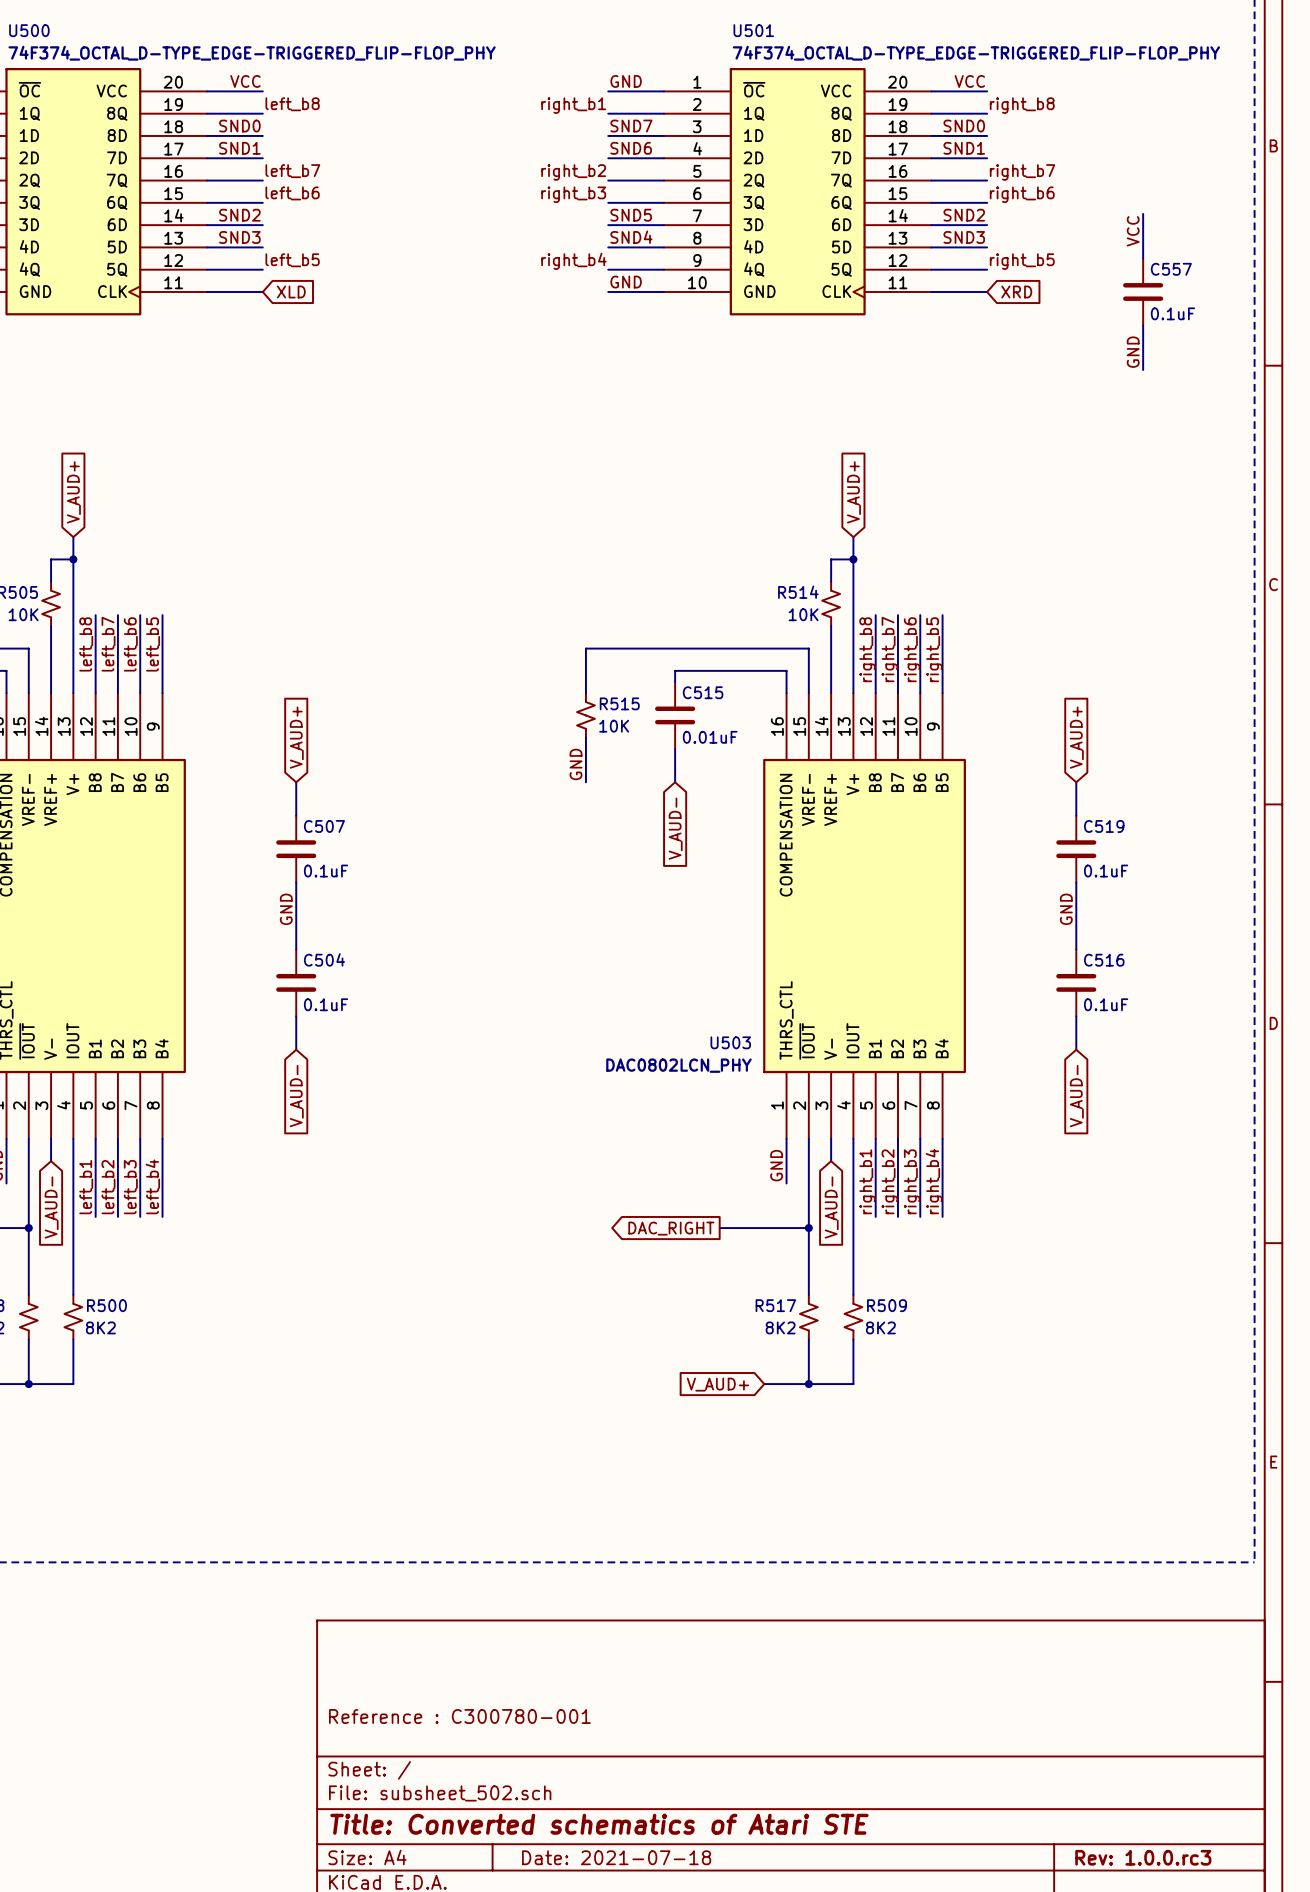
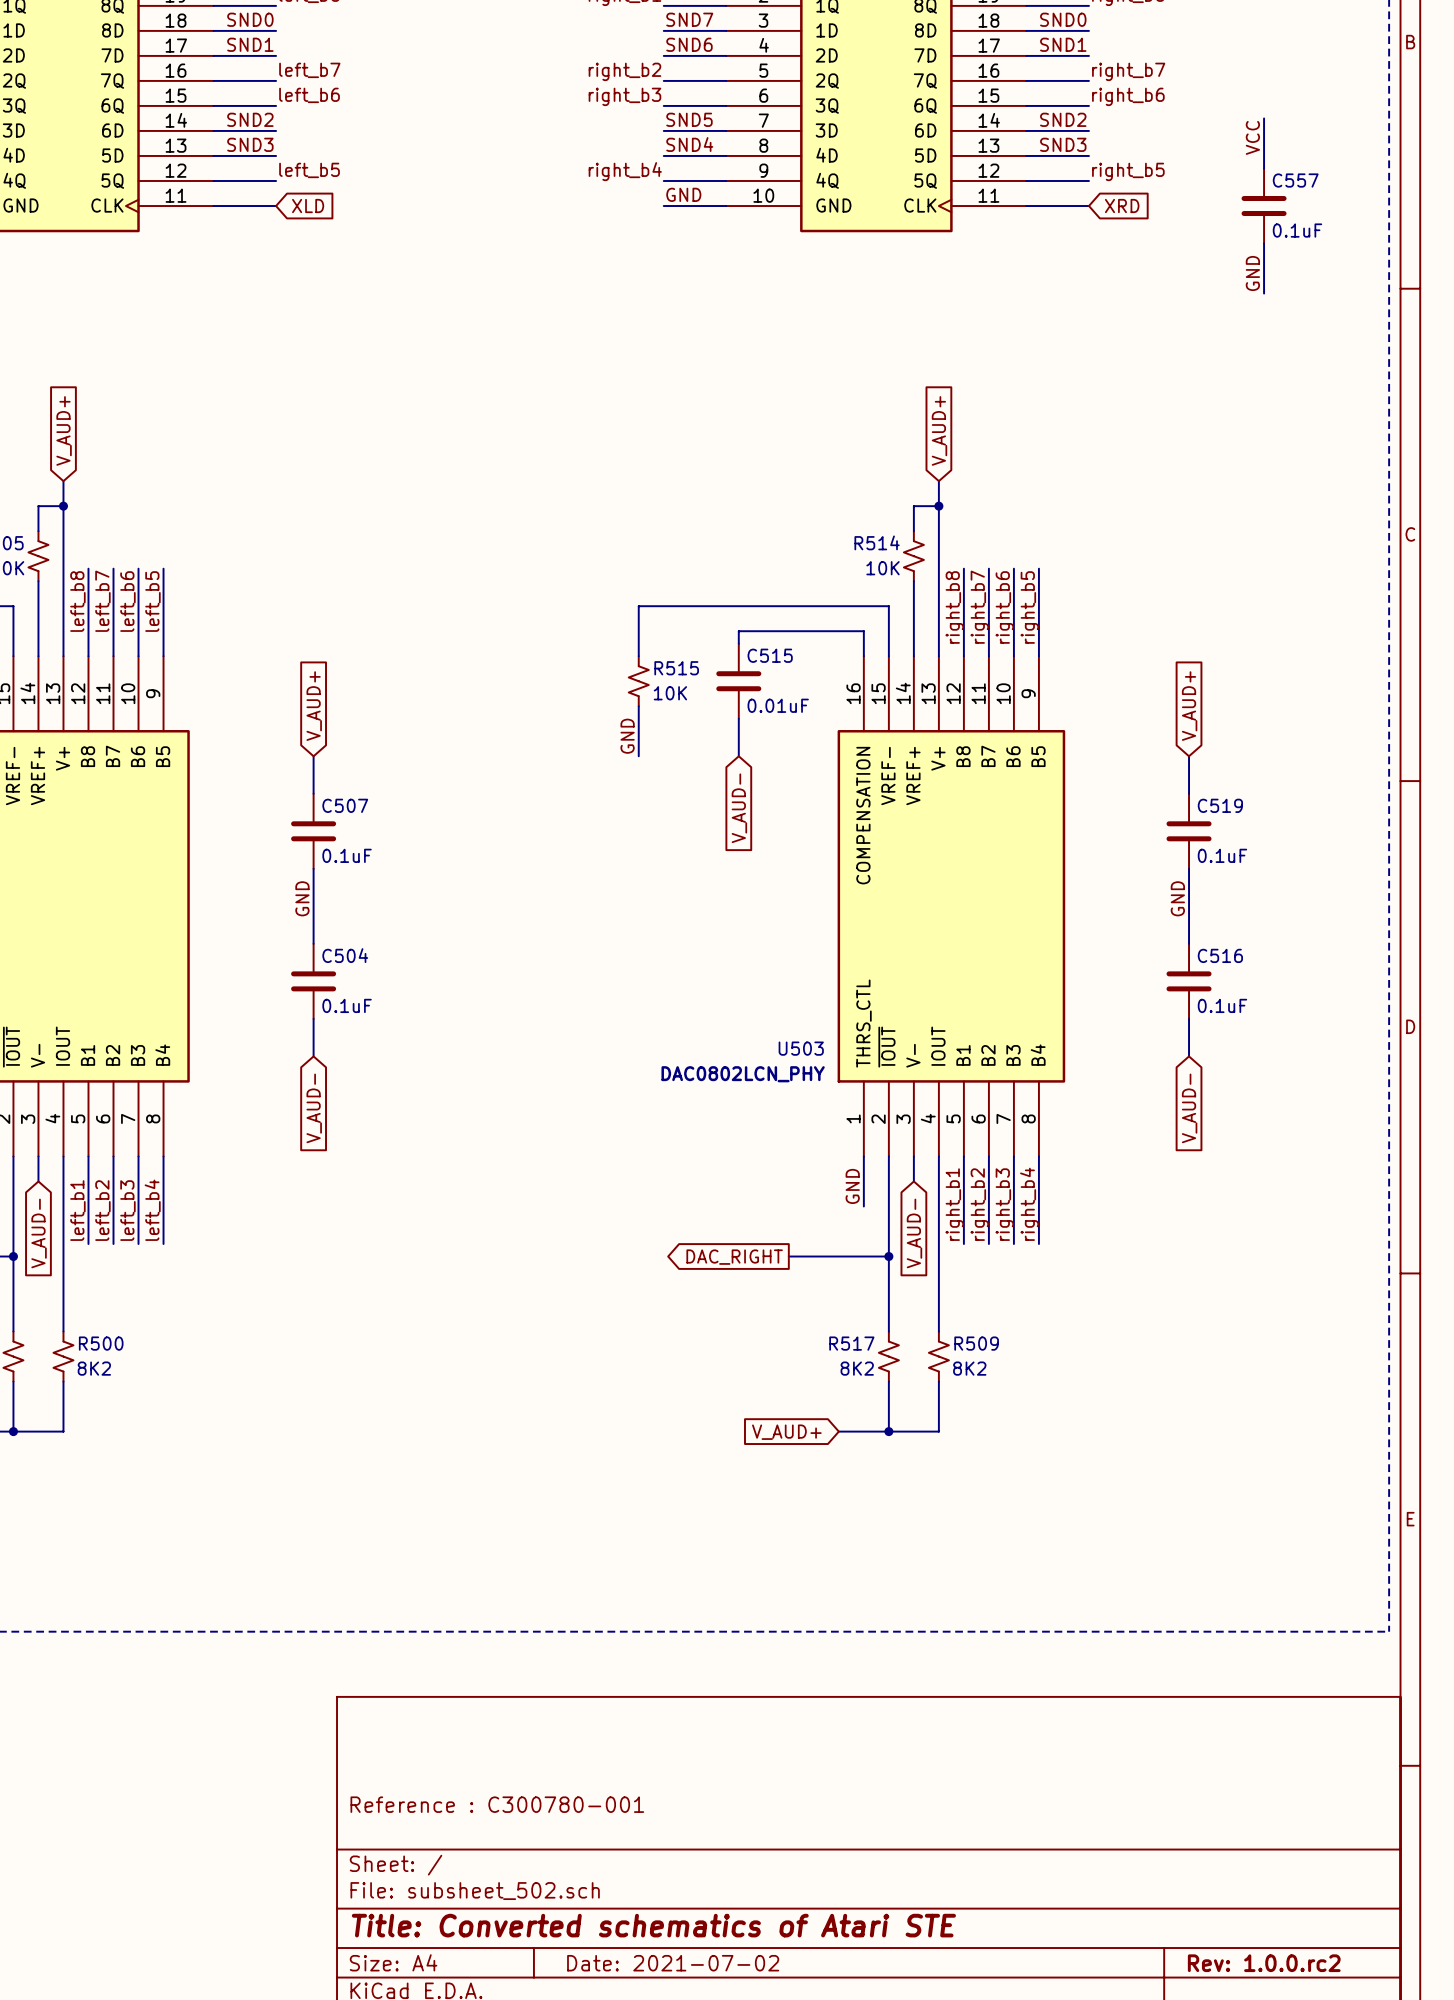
title block: Date: 2021-07-18 (616, 1857) -> Date: 2021-07-02 (673, 1963)
title block: Rev: 1.0.0.rc3 (1143, 1857) -> Rev: 1.0.0.rc2 (1264, 1963)

